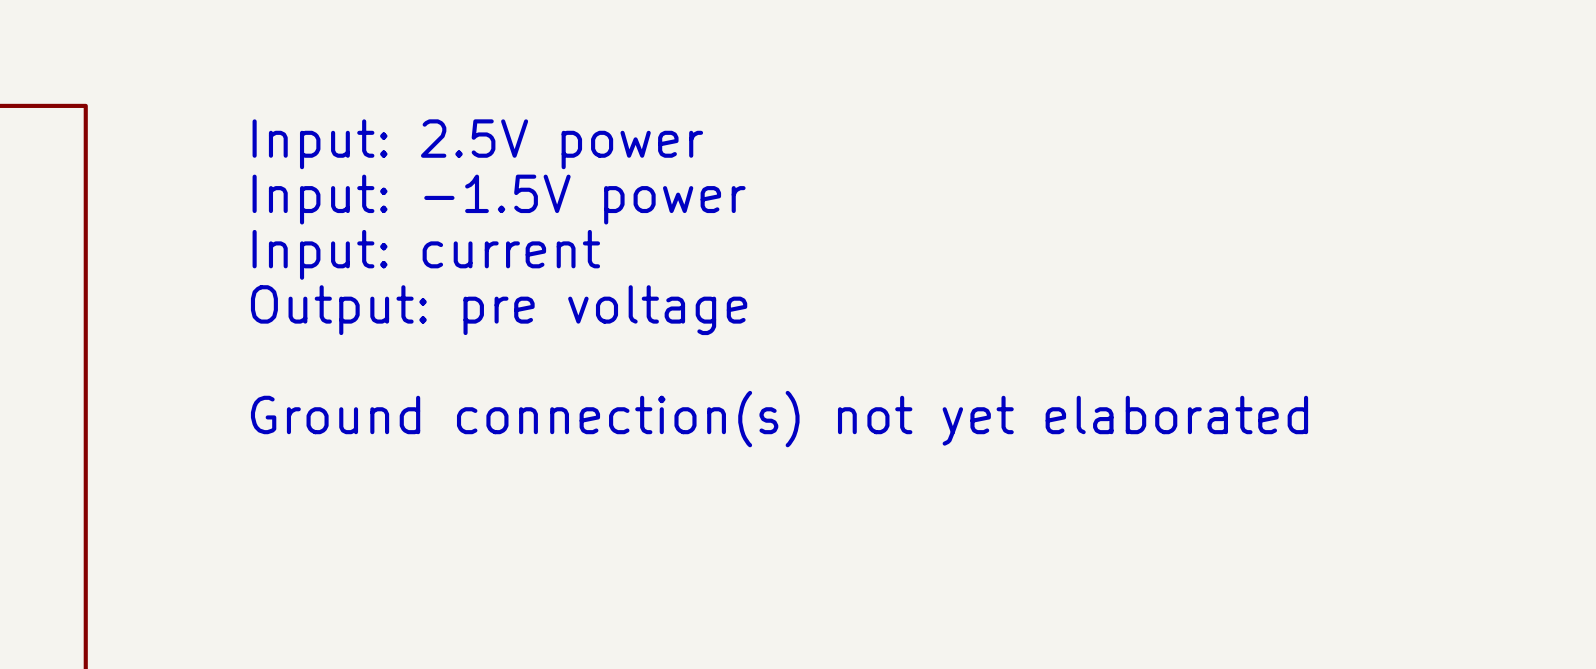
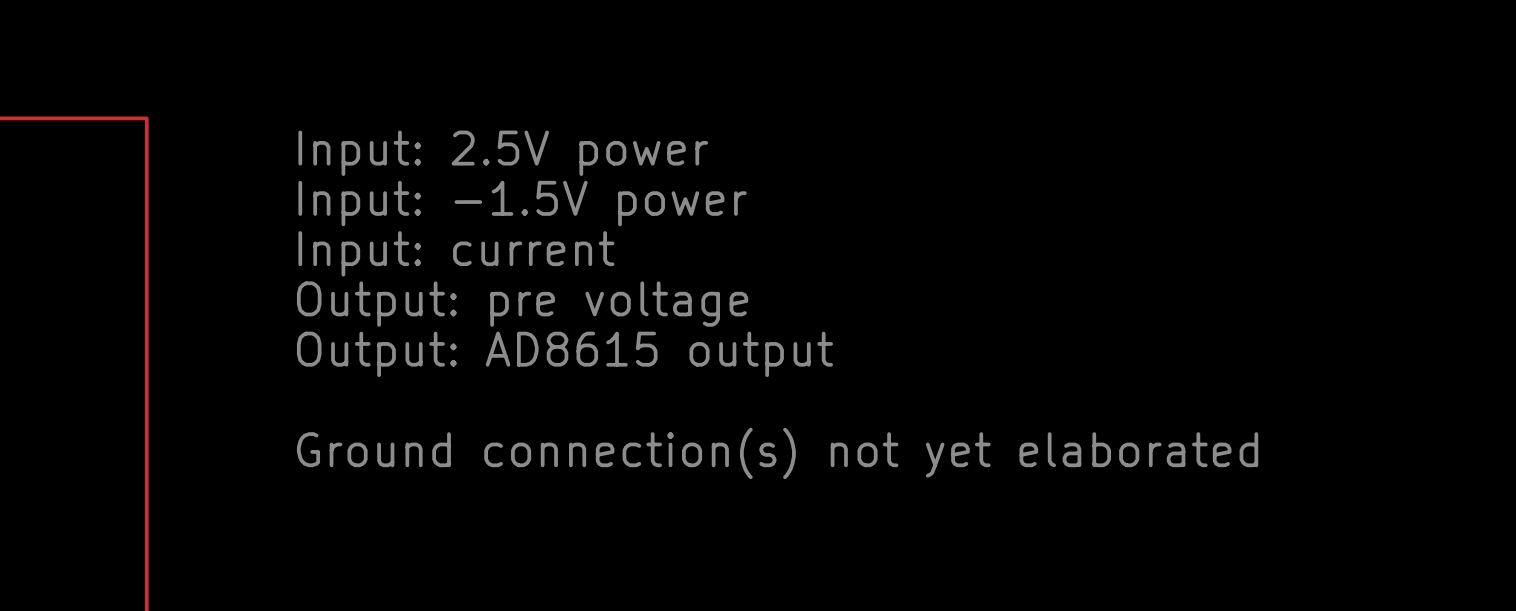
text: none -> Output: AD8615 output (564, 354)
text position: Ground connection(s) not yet elaborated (779, 419) -> Ground connection(s) not yet elaborated (777, 453)

